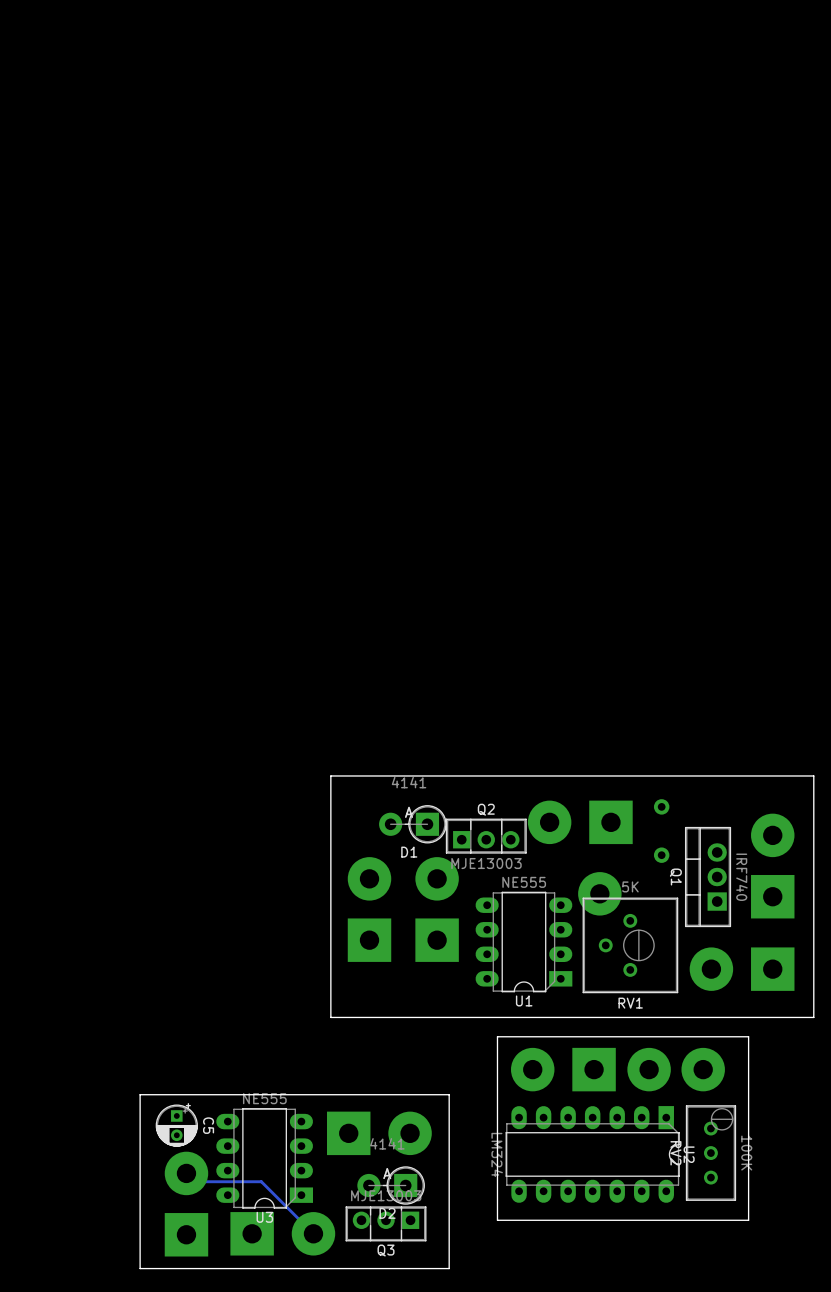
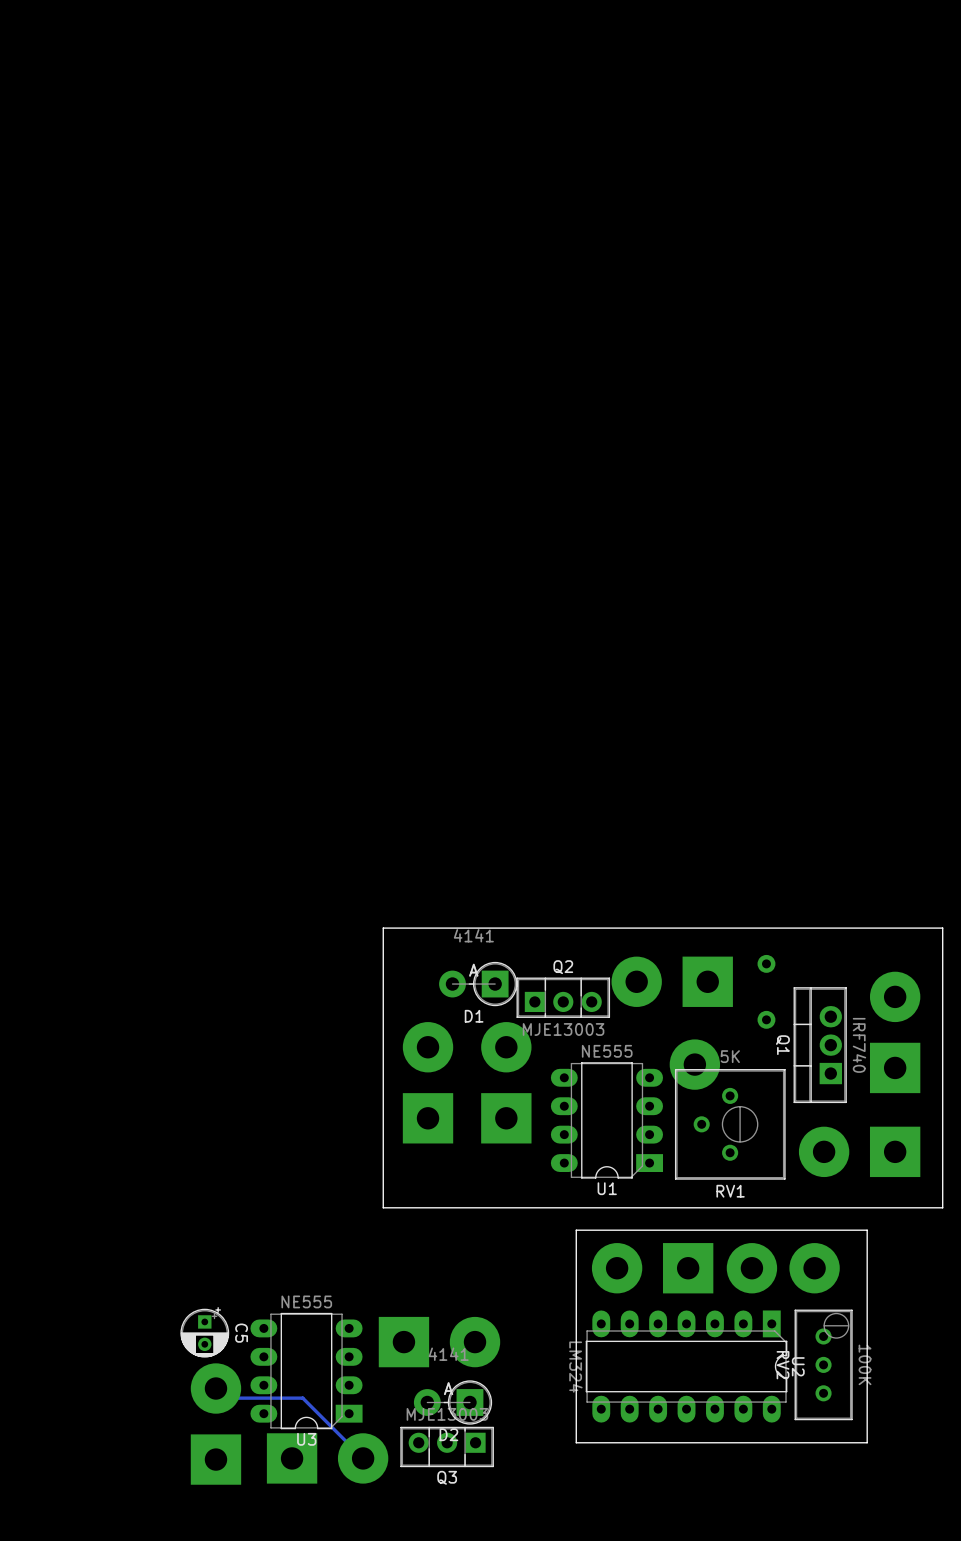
board edge: (449, 1094) (140, 1094) (140, 1268) (449, 1268) (449, 1094) -> none

